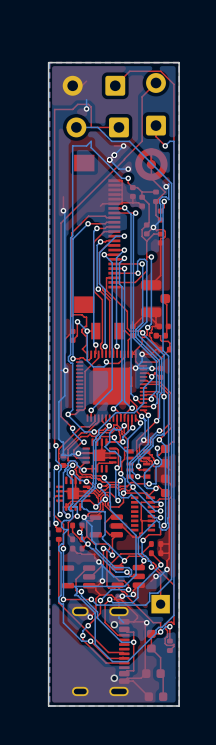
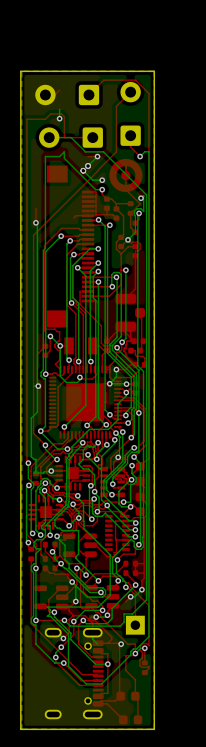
part: (151, 641) -> none

